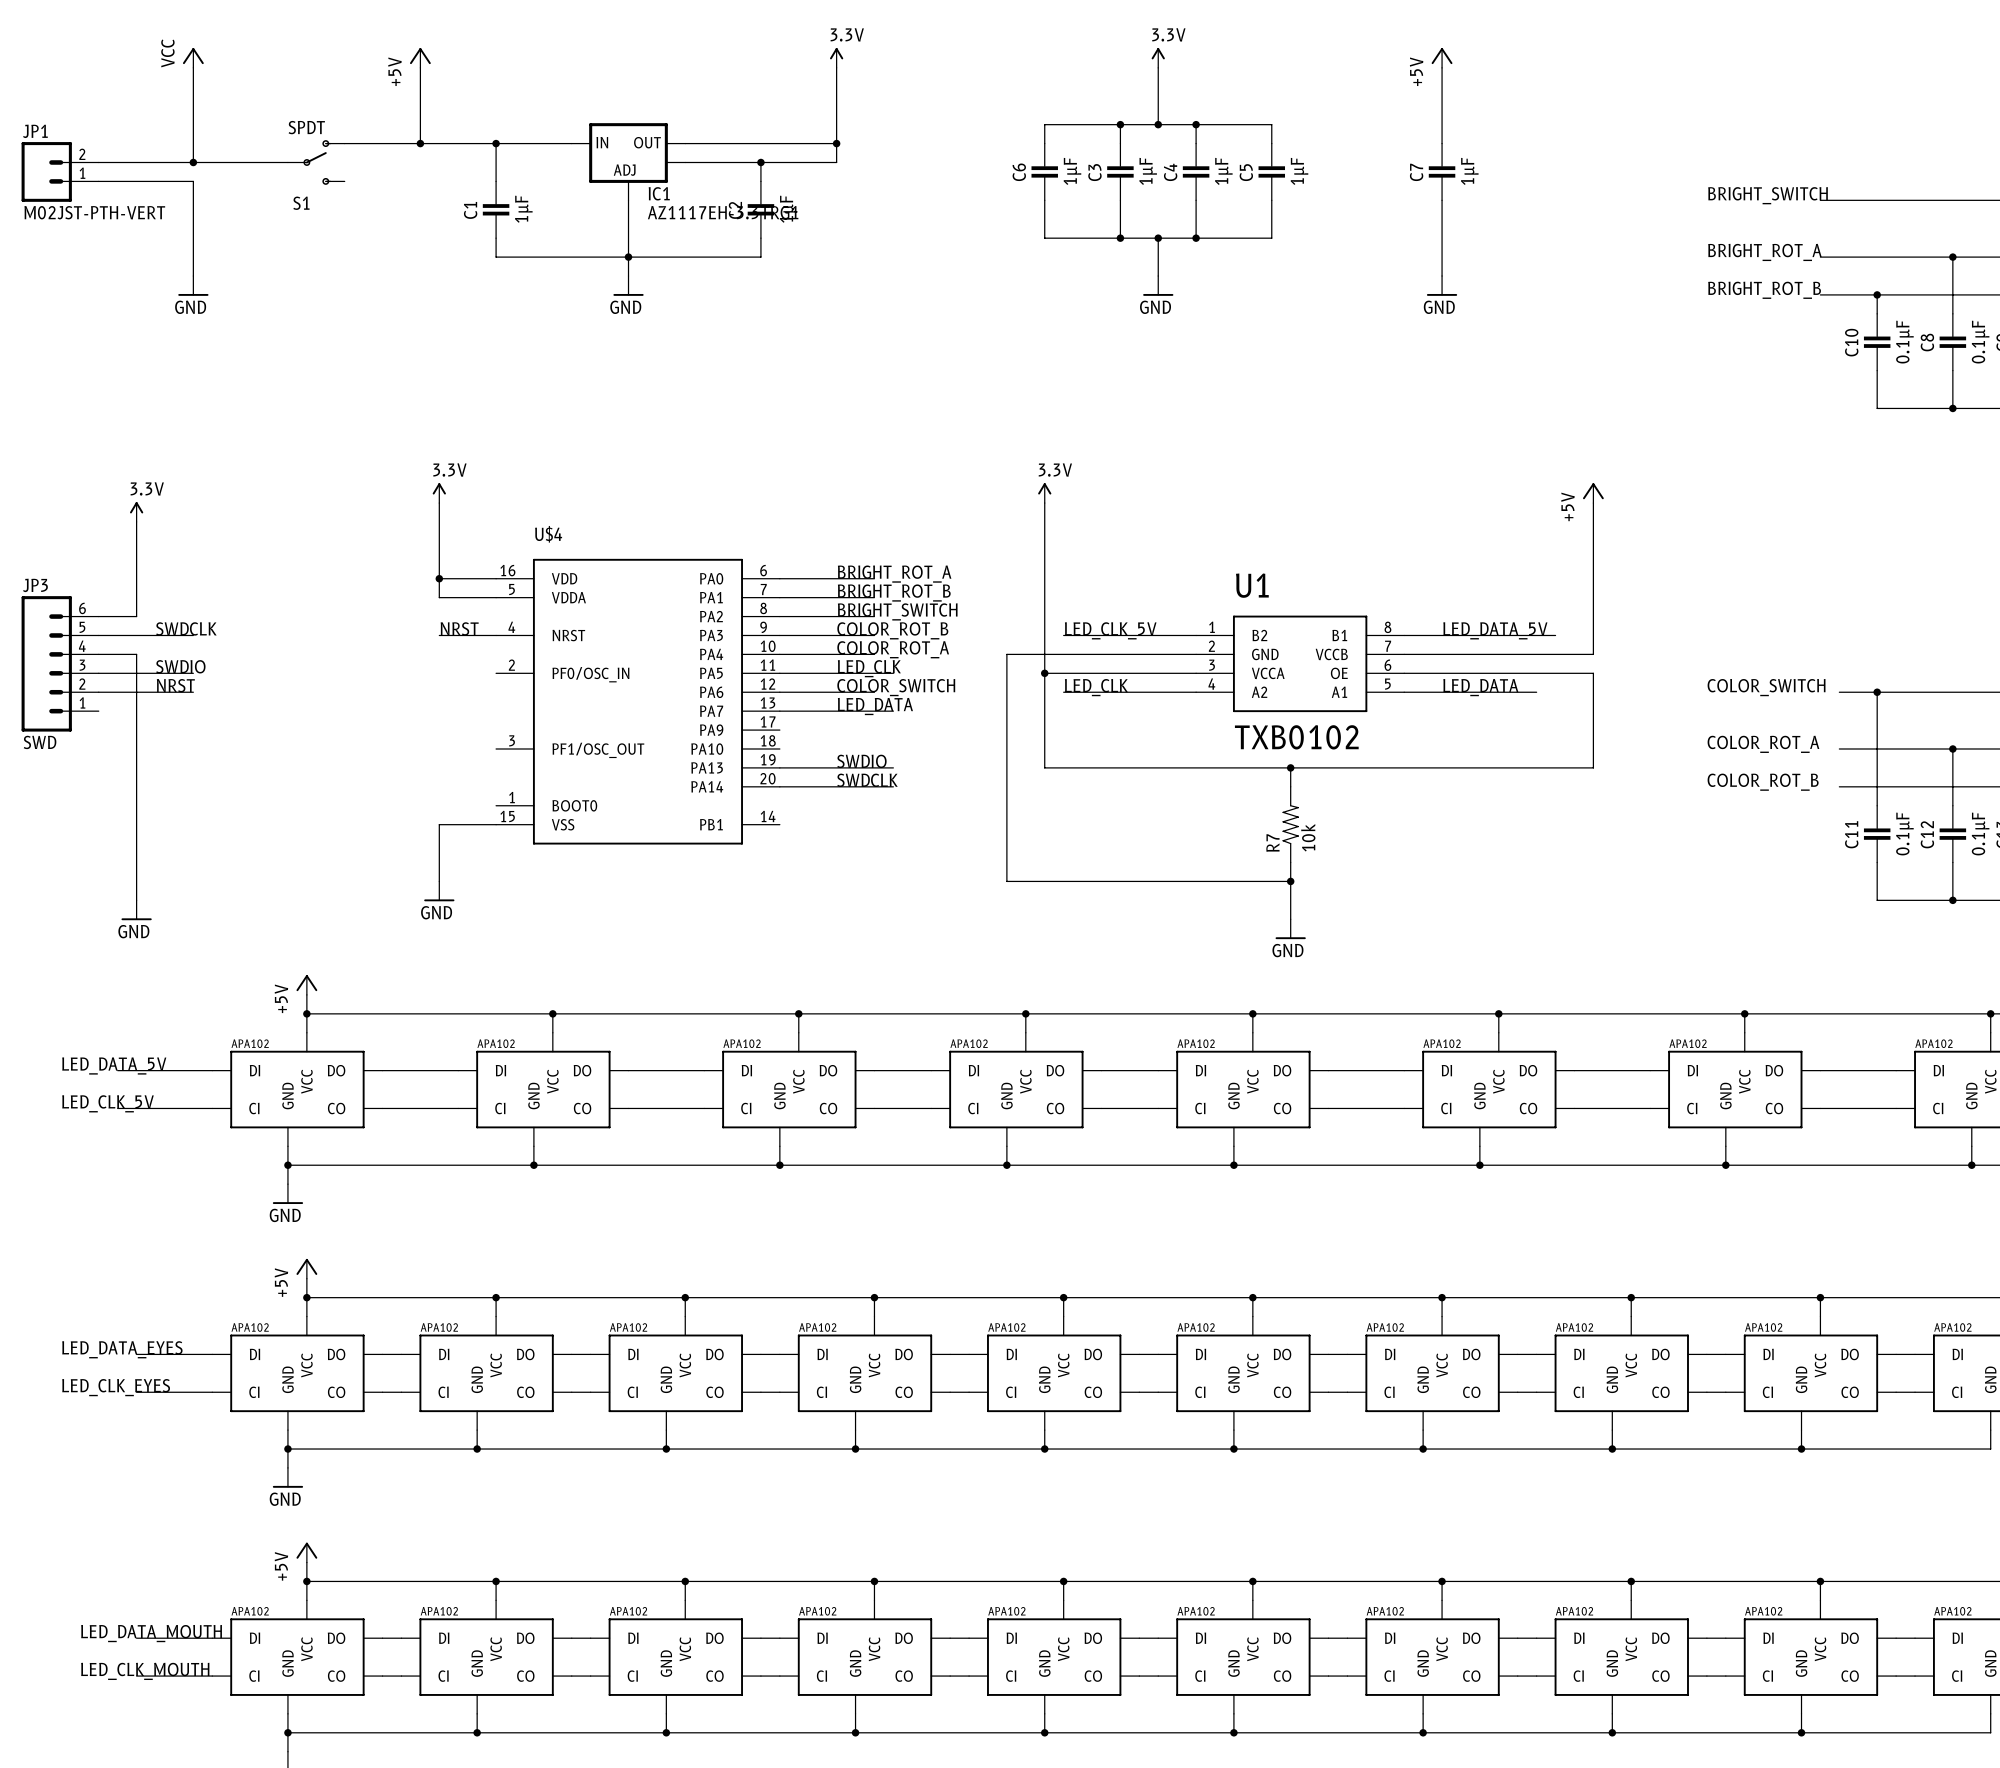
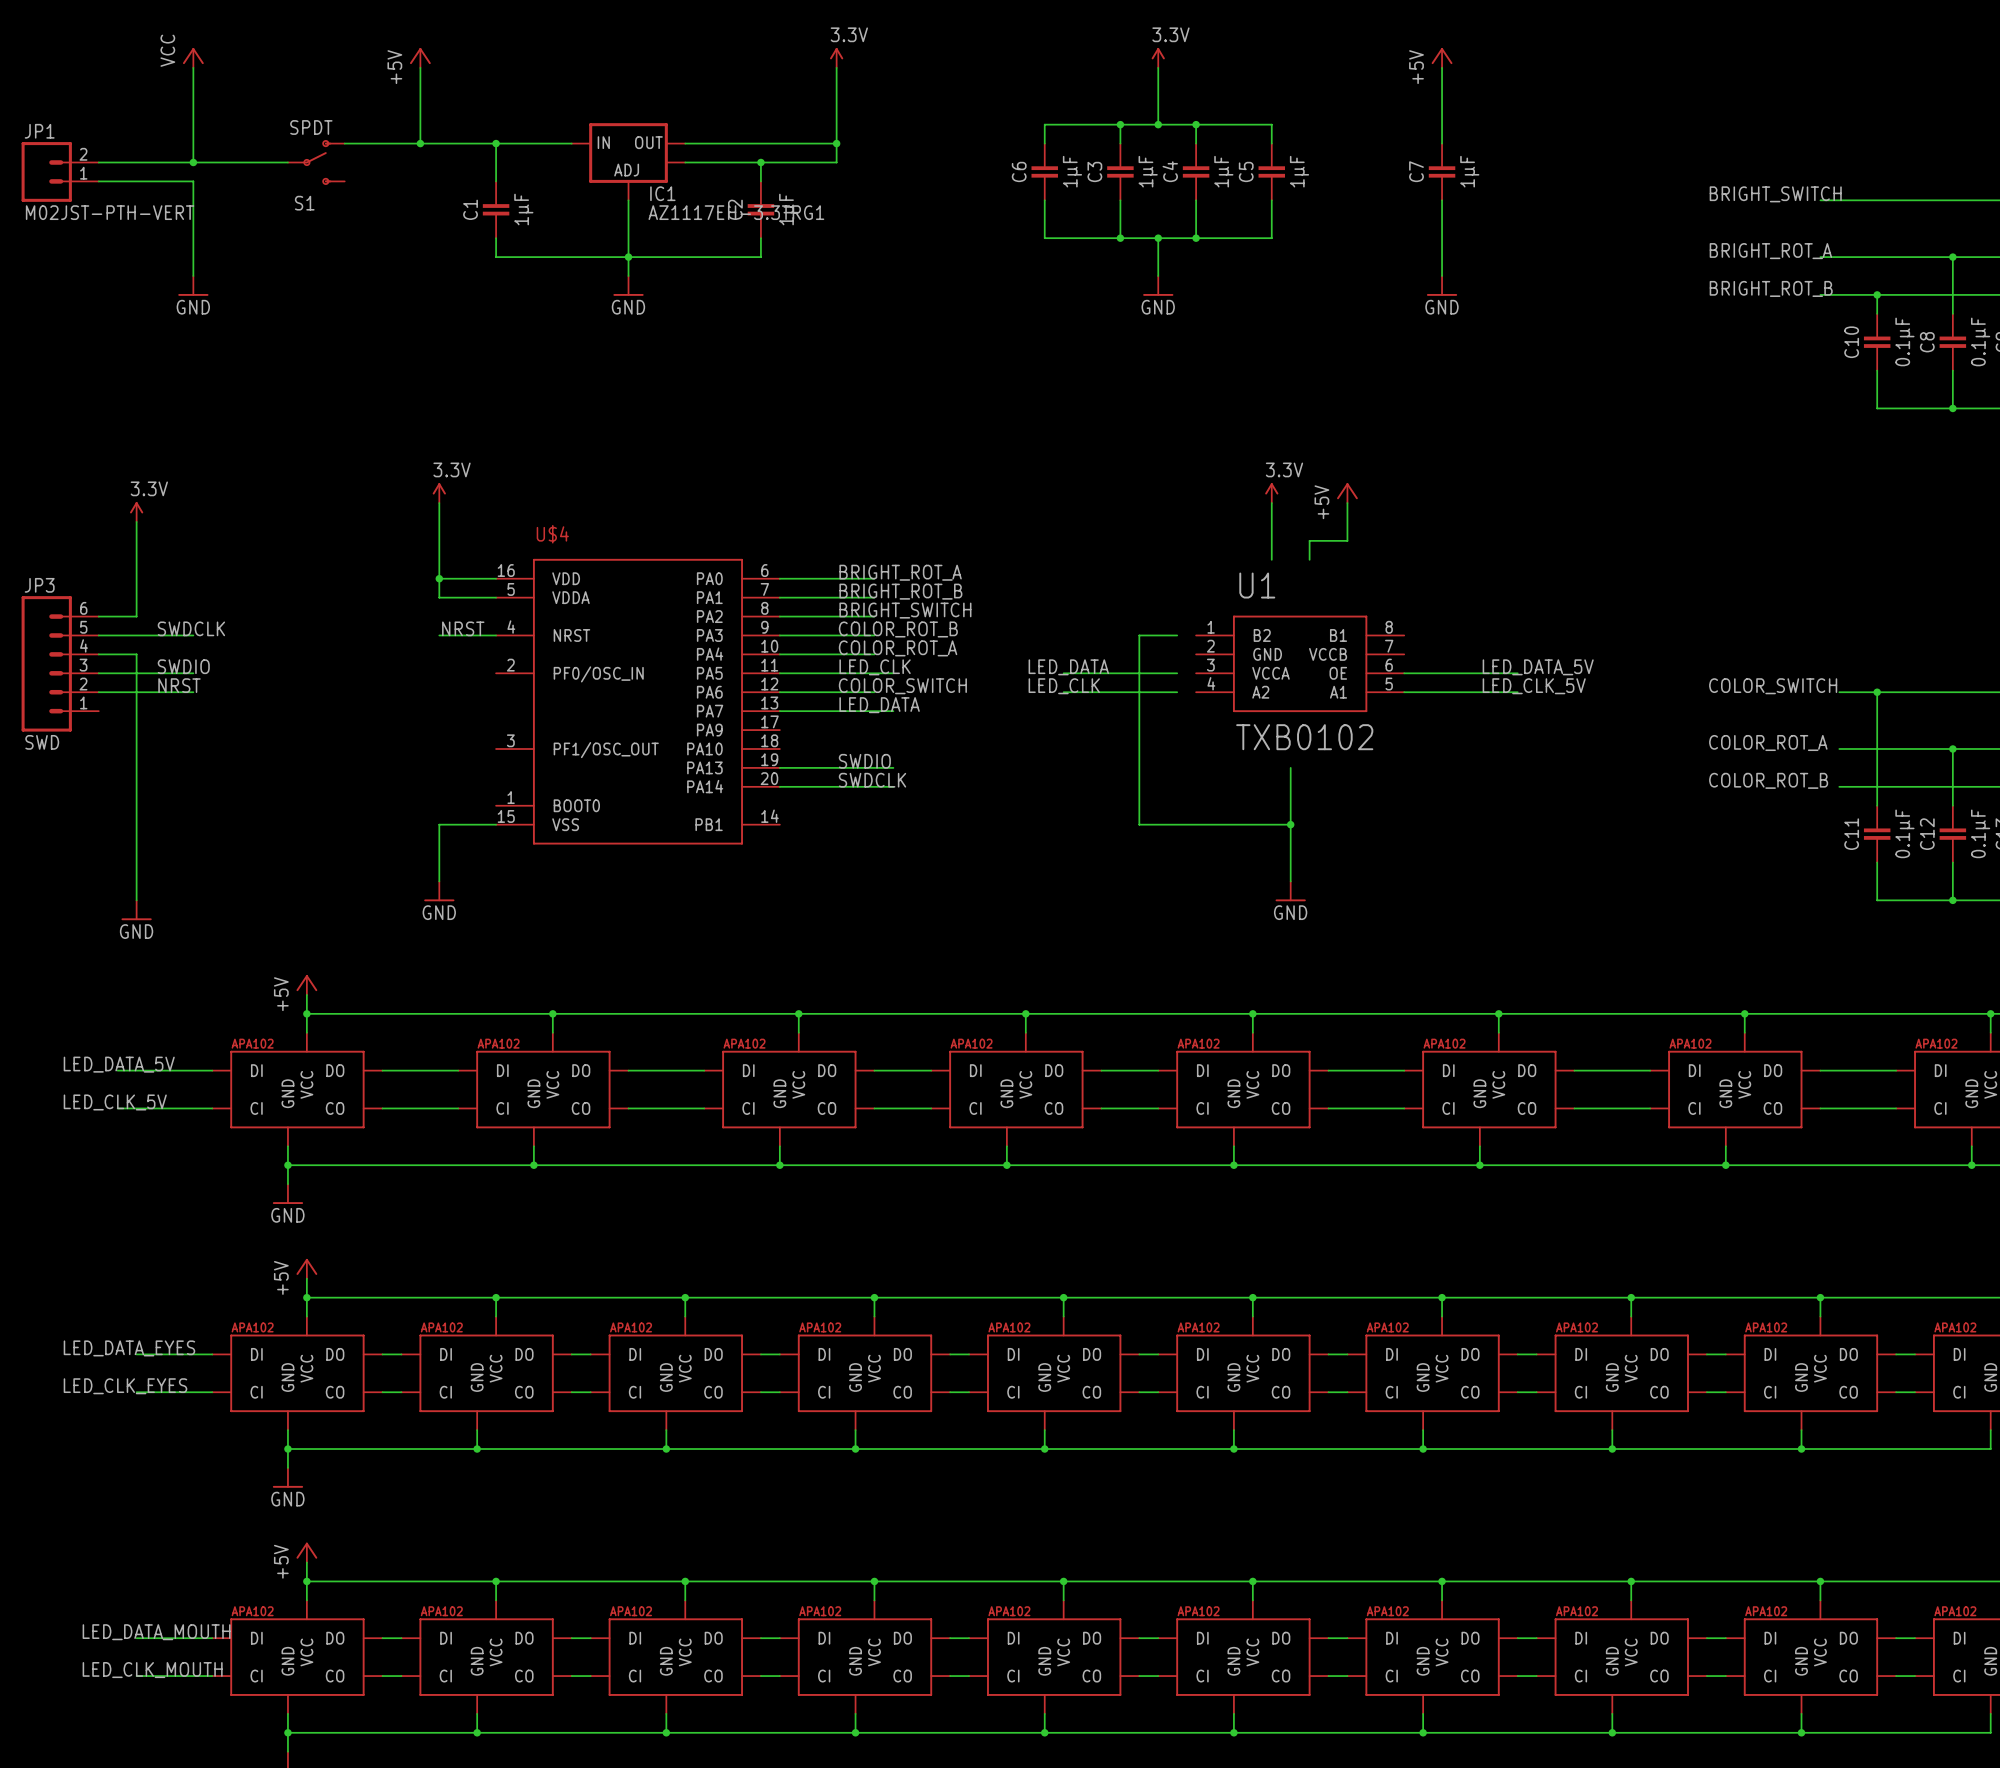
power symbol: 3.3V (1044, 493) -> none
power symbol: none -> 3.3V (1271, 493)
power symbol: none -> +5V (1347, 493)
power symbol: +5V (1593, 493) -> none
wire: (1044, 503) (1044, 767) (1593, 767) (1593, 673) (1517, 673) -> none
wire: none -> (1271, 503) (1271, 559)
wire: none -> (1347, 503) (1347, 540) (1309, 540) (1309, 559)
wire: (1593, 503) (1593, 654) (1404, 654) -> none
label: LED_CLK_5V (1110, 630) -> none
label position: LED_DATA_5V (1495, 630) -> LED_DATA_5V (1538, 667)
wire: (1063, 635) (1139, 635) -> (1290, 824) (1139, 824) (1139, 635)
wire: (1177, 635) (1196, 635) -> none
wire: (1404, 635) (1555, 635) -> none
wire: (1196, 654) (1006, 654) (1006, 881) (1290, 881) (1290, 919) -> none
label: none -> LED_DATA (1068, 667)
wire: (1044, 673) (1063, 673) -> none
junction: (1044, 673) -> none
wire: (1177, 673) (1196, 673) -> none
label position: LED_CLK (1096, 687) -> LED_CLK (1064, 686)
label: LED_DATA (1480, 687) -> none
label: none -> LED_CLK_5V (1534, 686)
wire: (1177, 692) (1196, 692) -> none
wire: (1517, 692) (1536, 692) -> none
junction: (1290, 767) -> none
R7: 10k (1290, 824) -> none
junction: none -> (1290, 824)
junction: (1290, 881) -> none
power symbol position: GND (1290, 929) -> GND (1290, 891)

